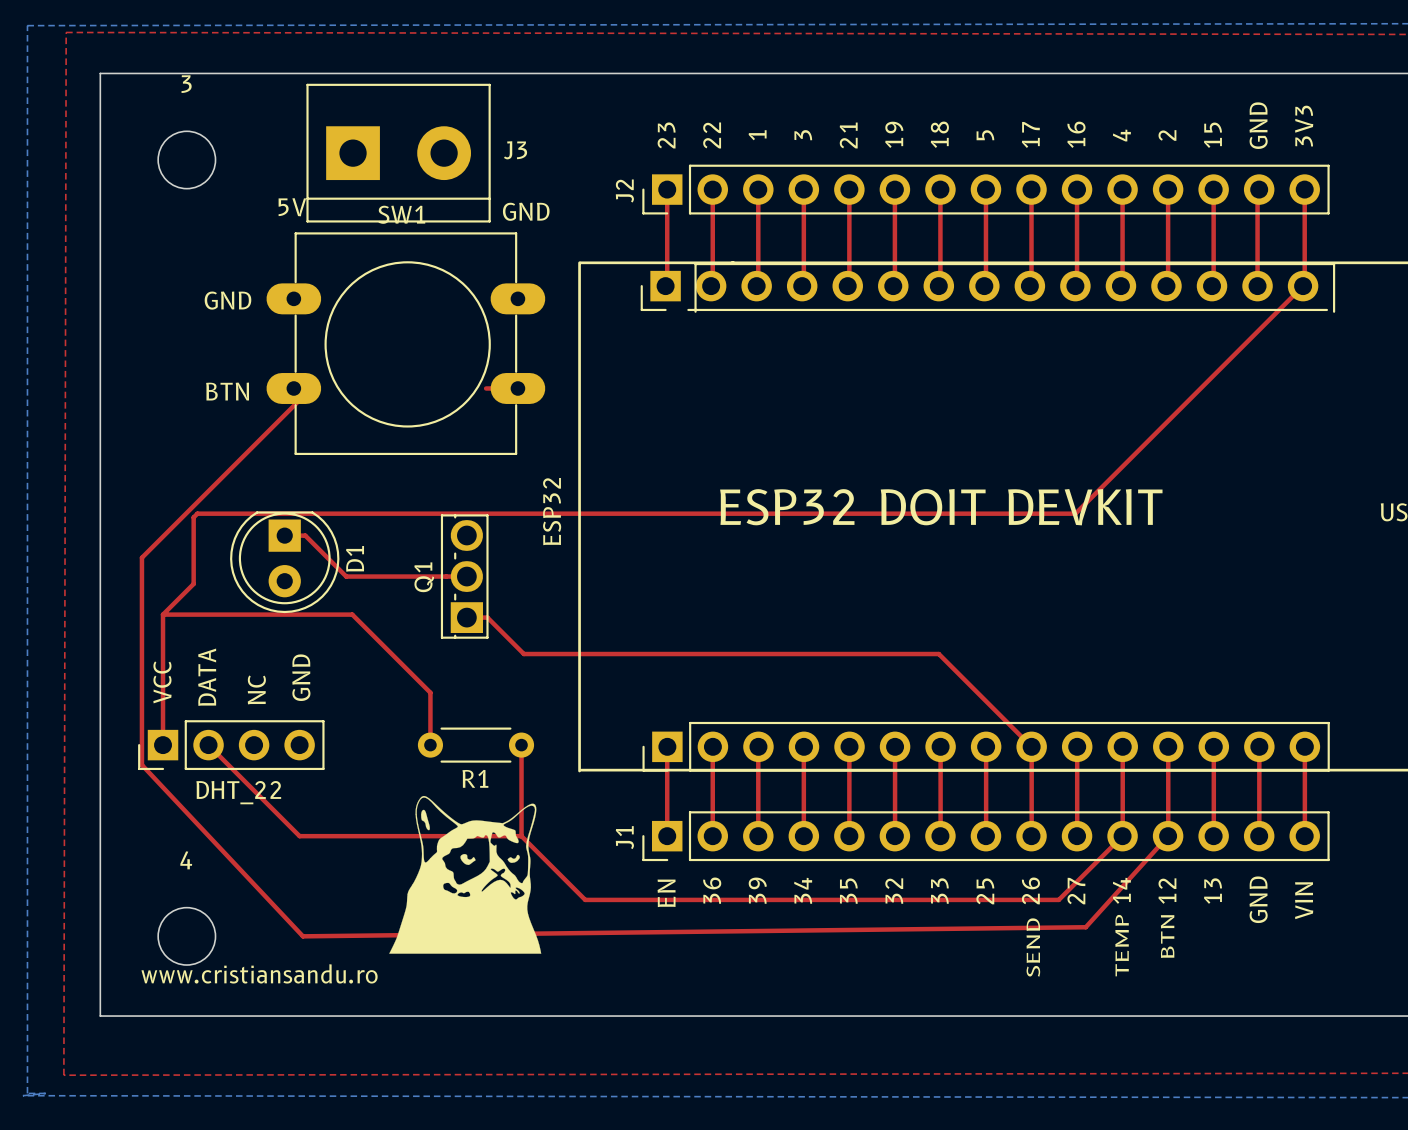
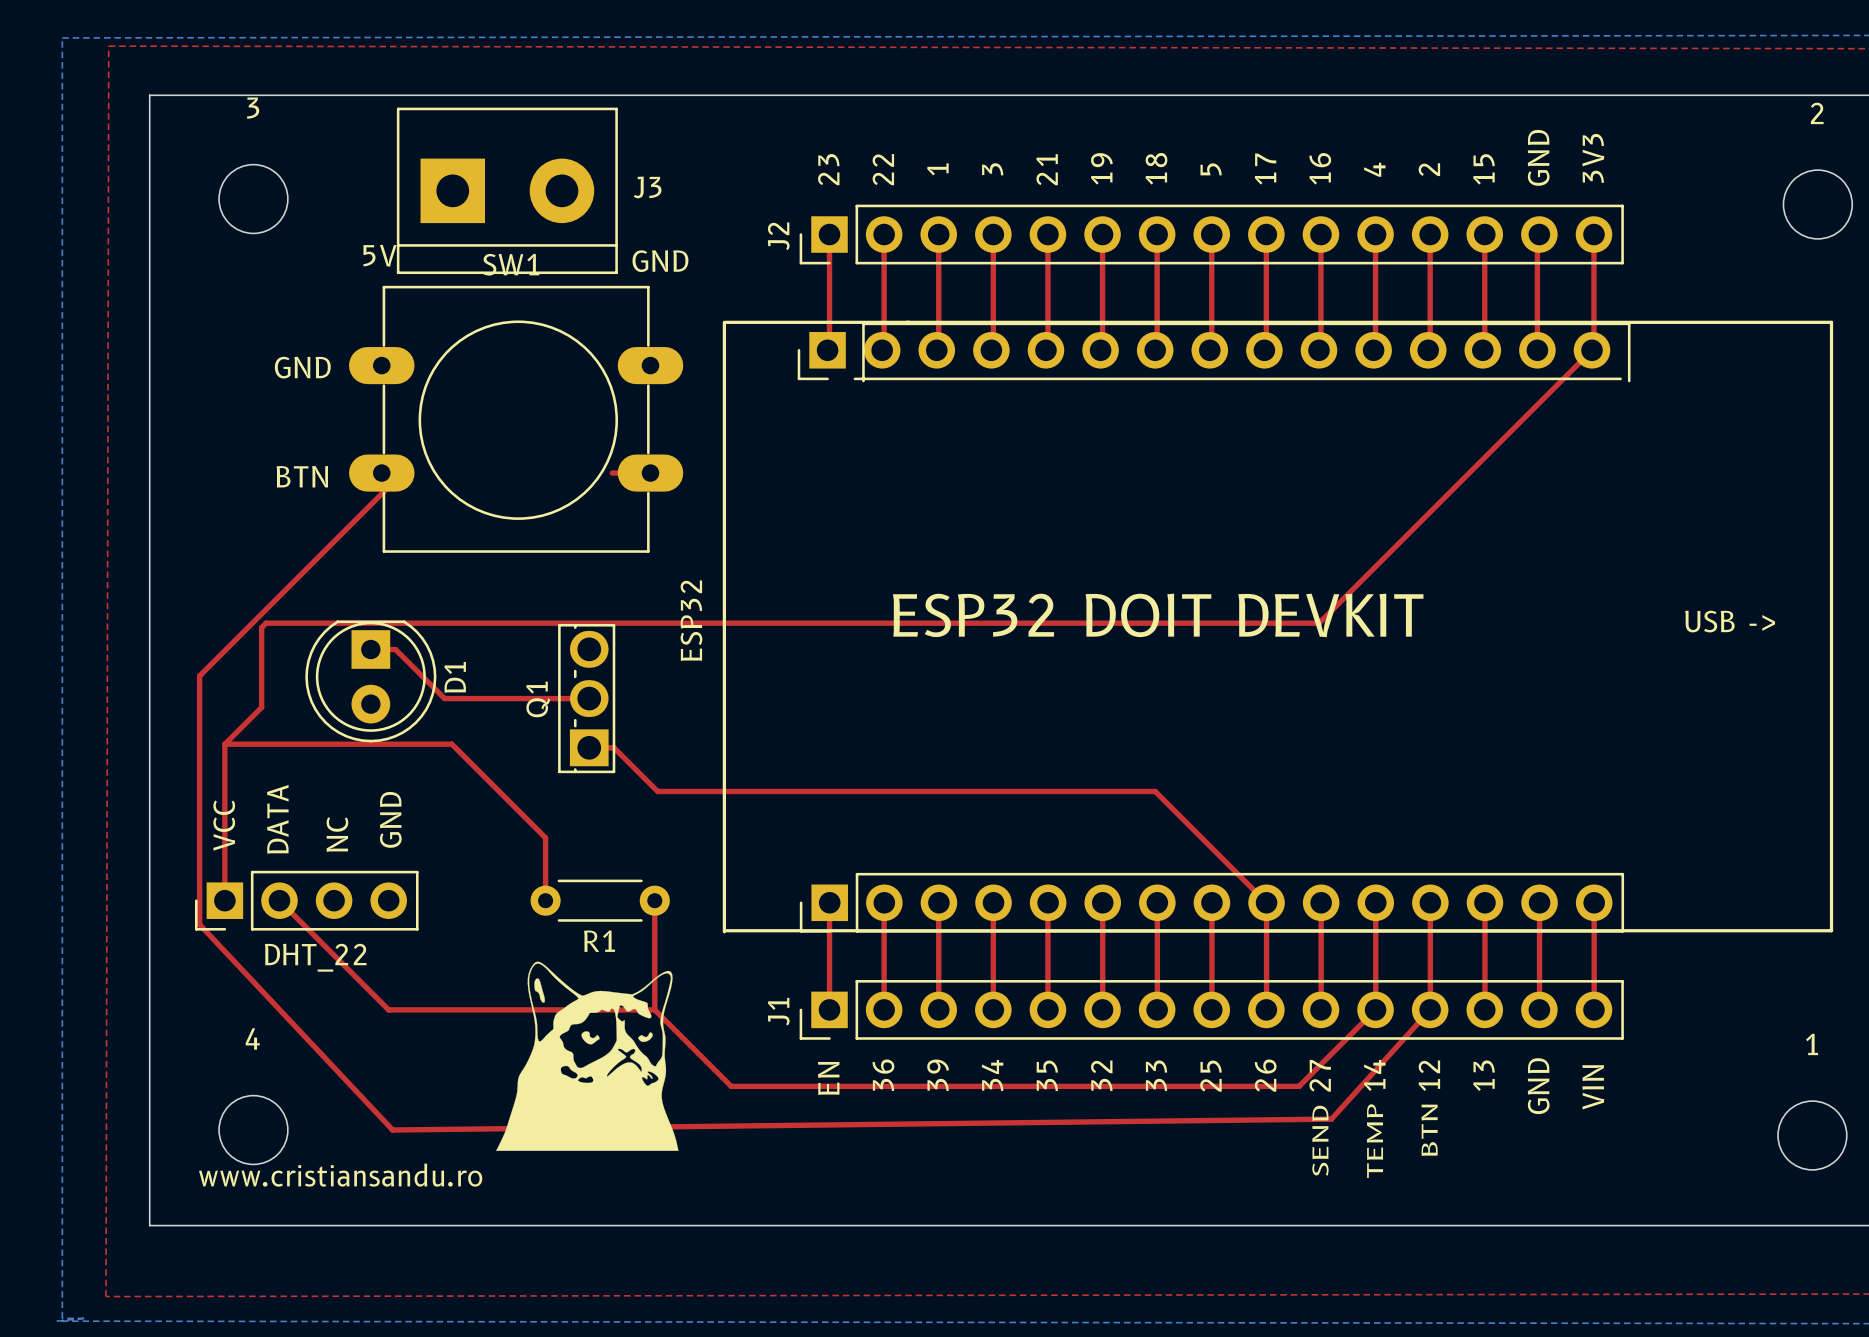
text position: SEND (1033, 947) -> SEND (1320, 1140)

